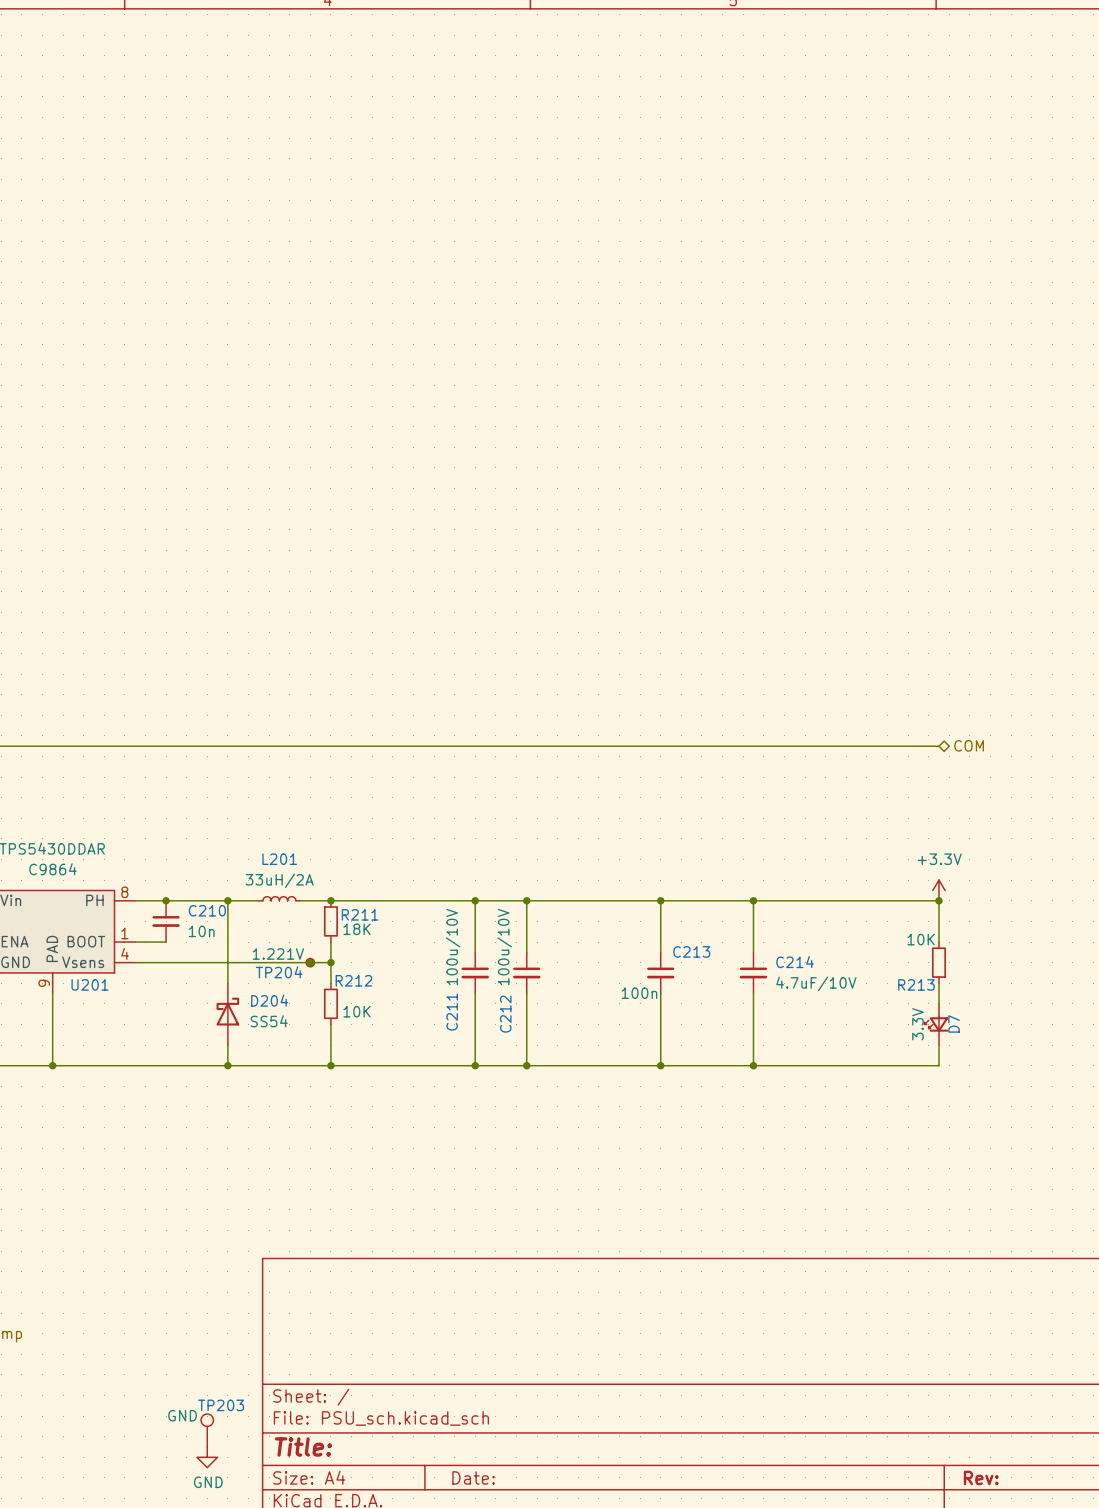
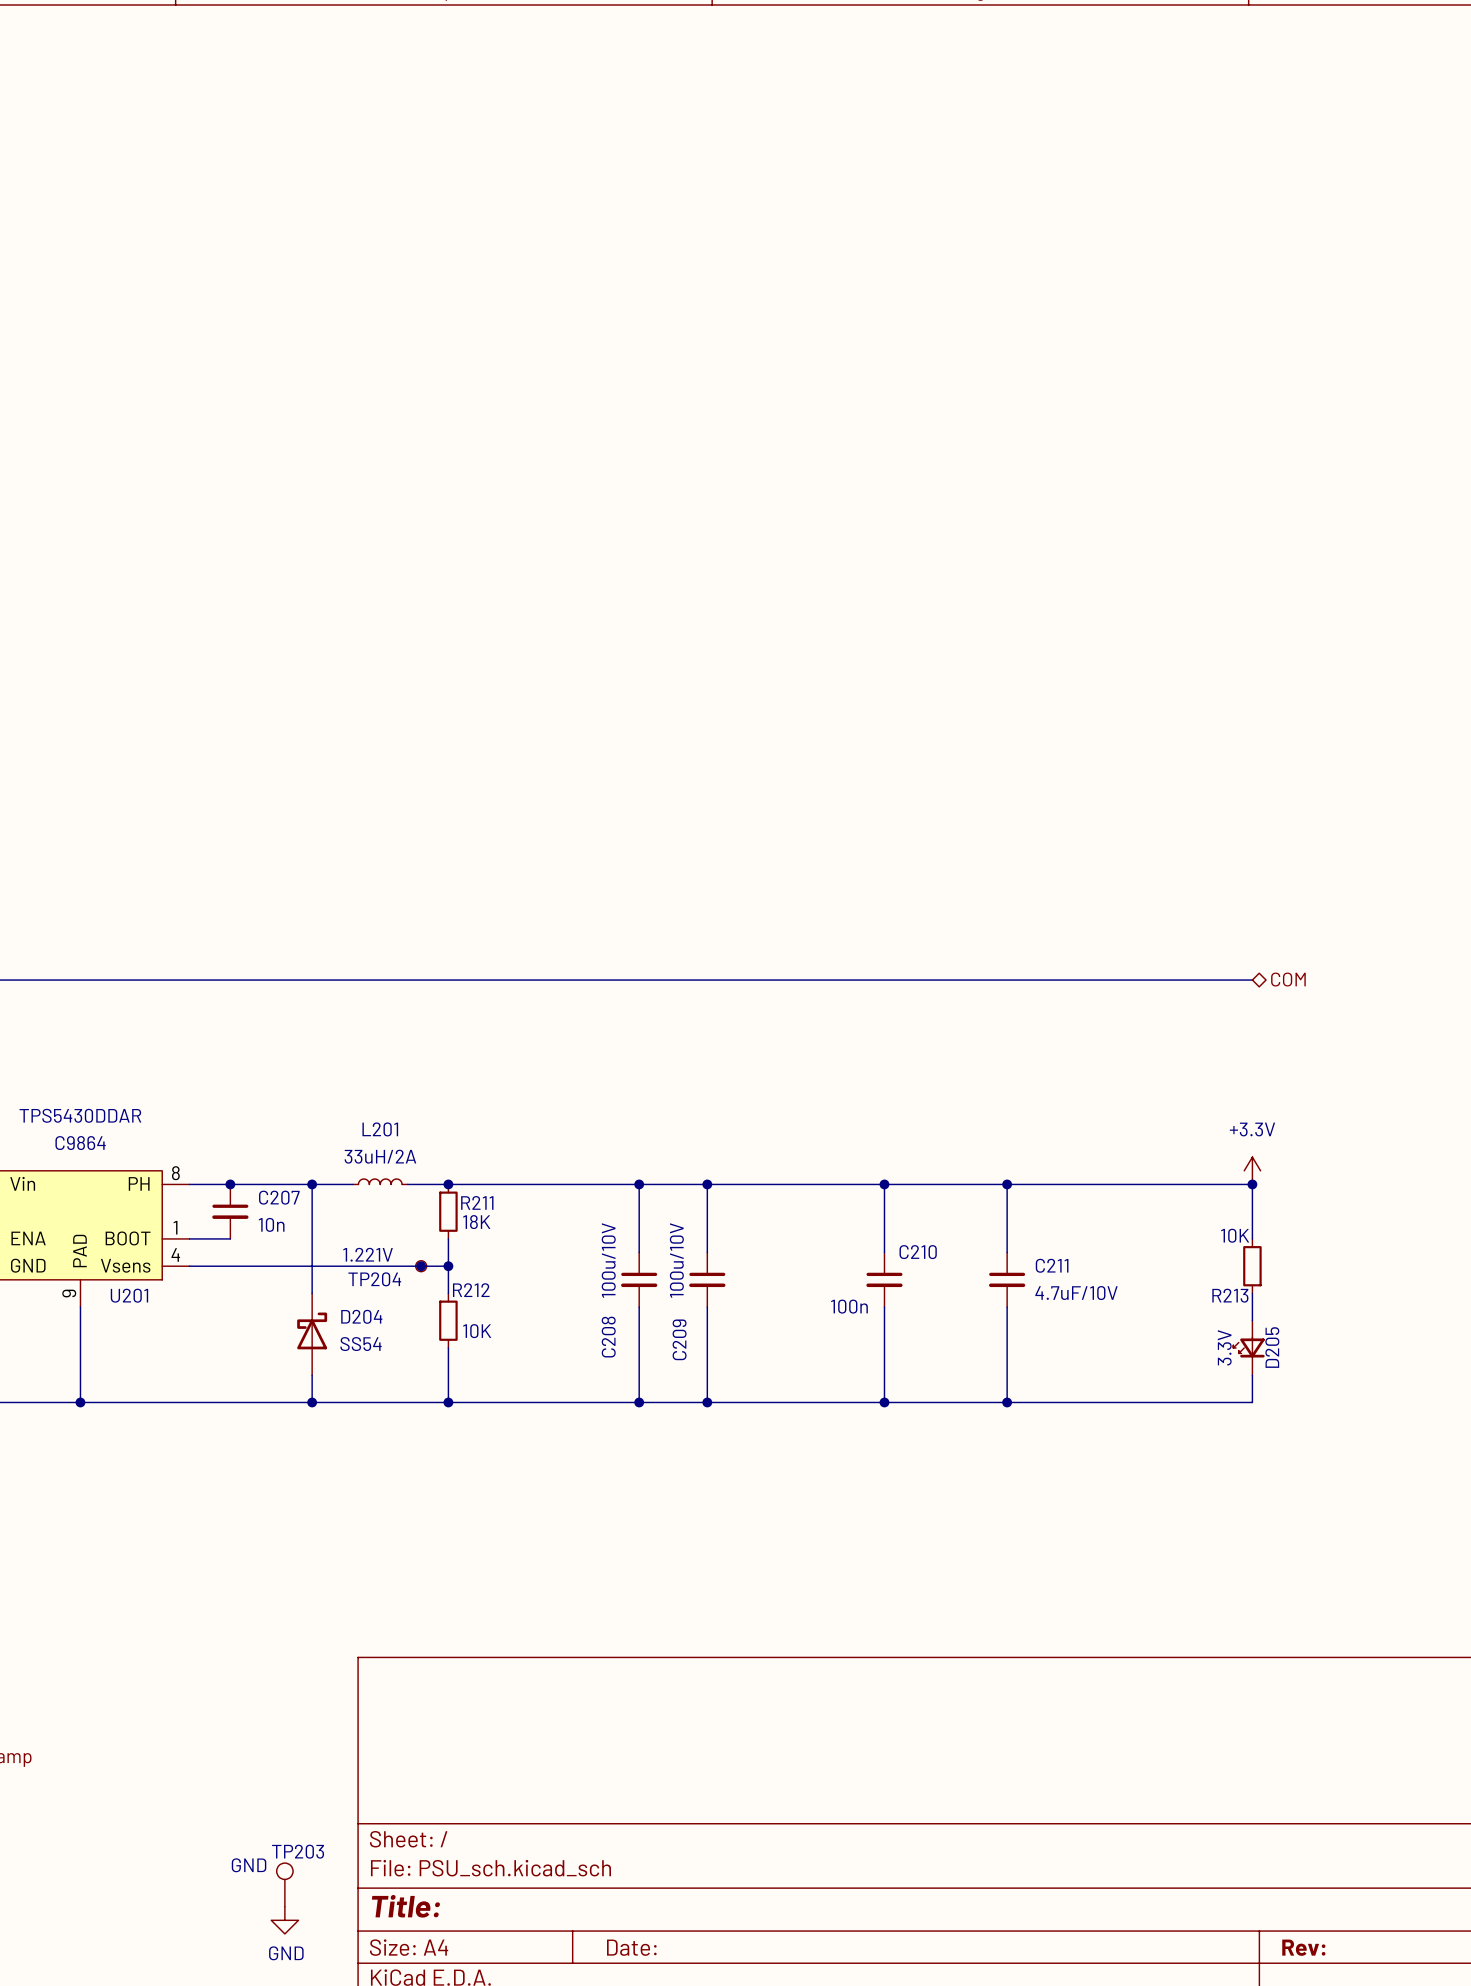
C210 name: C210 (207, 910) -> C207 (279, 1197)
C213 name: C213 (691, 951) -> C210 (918, 1252)
C214 name: C214 (795, 962) -> C211 (1052, 1265)
C211 name: C211 (452, 1012) -> C208 (608, 1337)
C212 name: C212 (505, 1014) -> C209 (679, 1339)
D7 name: D7 (954, 1023) -> D205 (1272, 1347)

